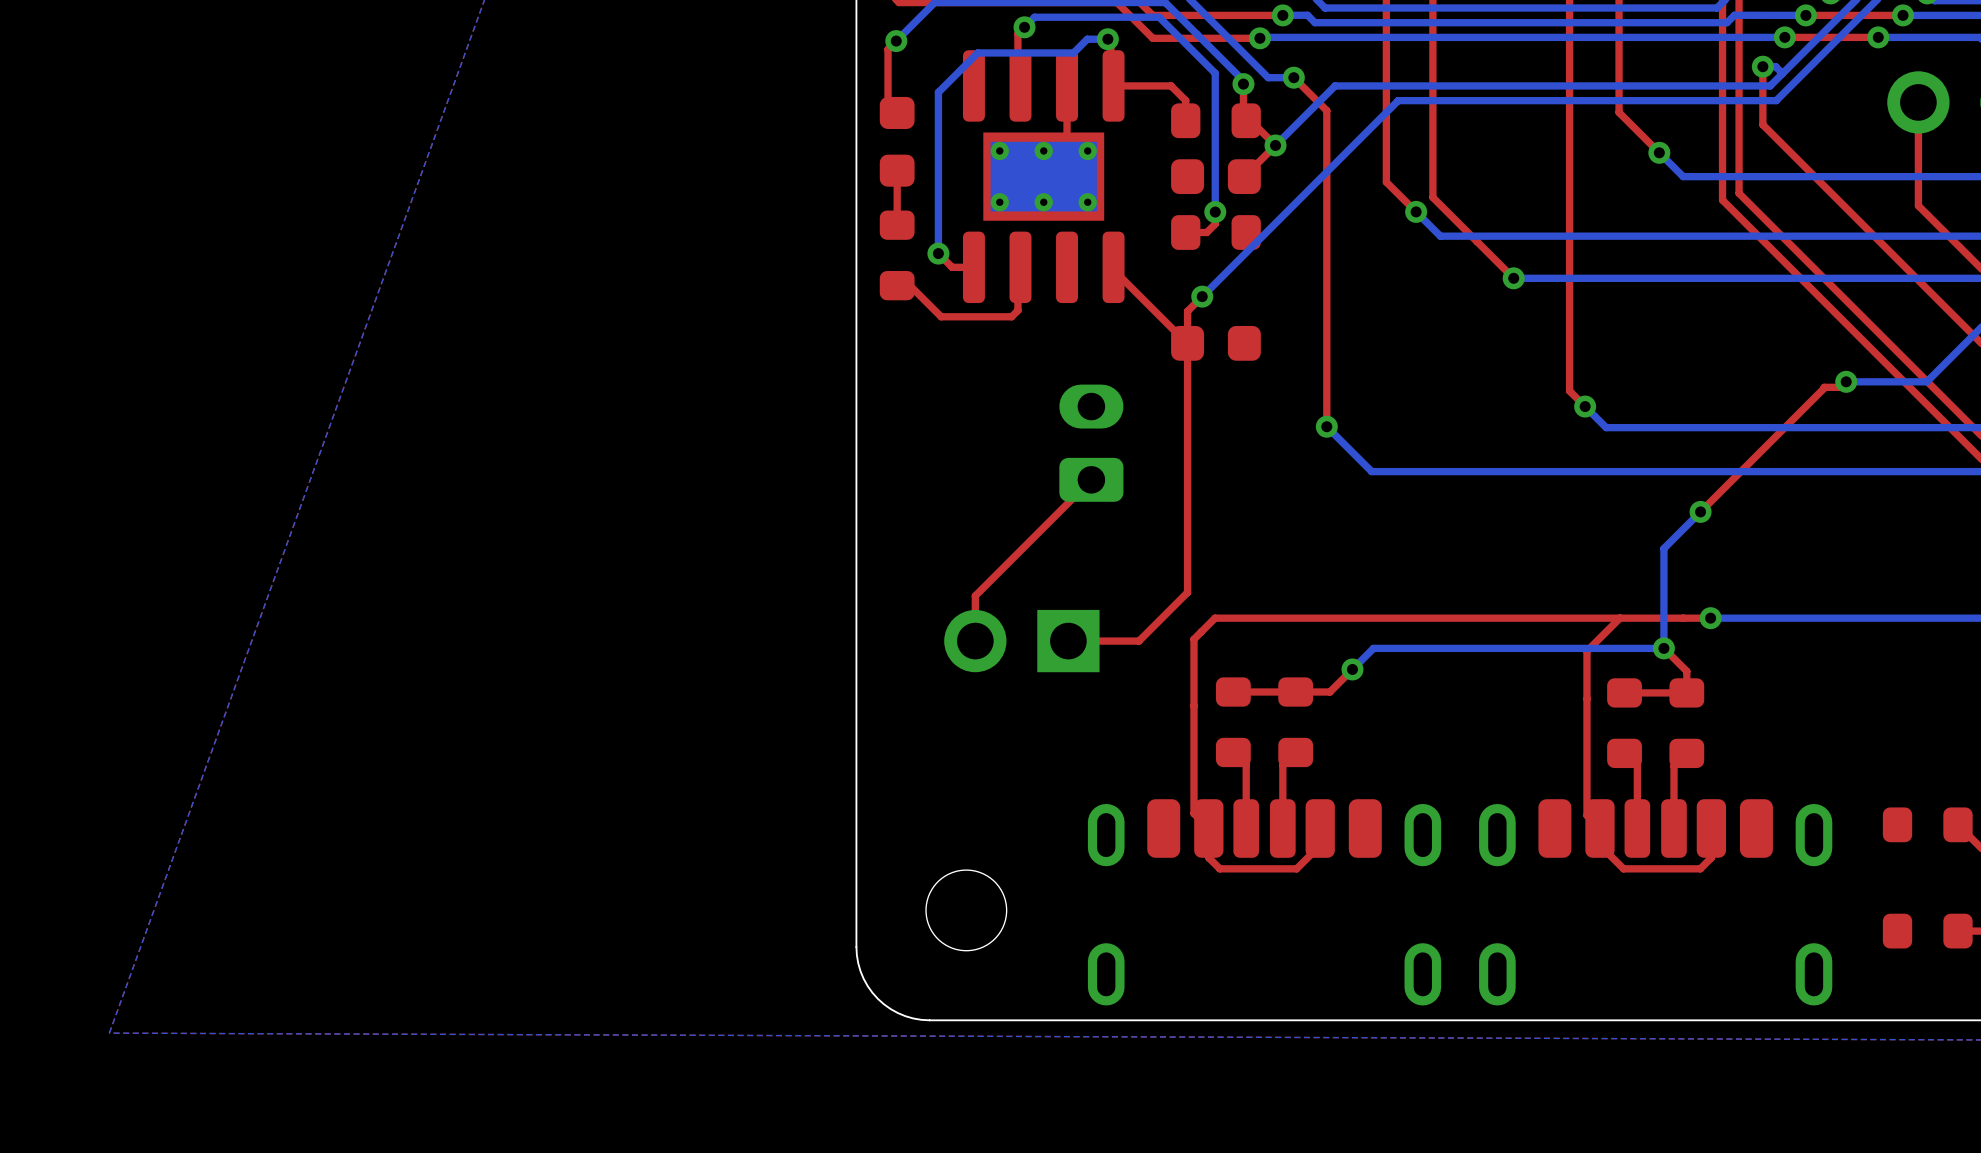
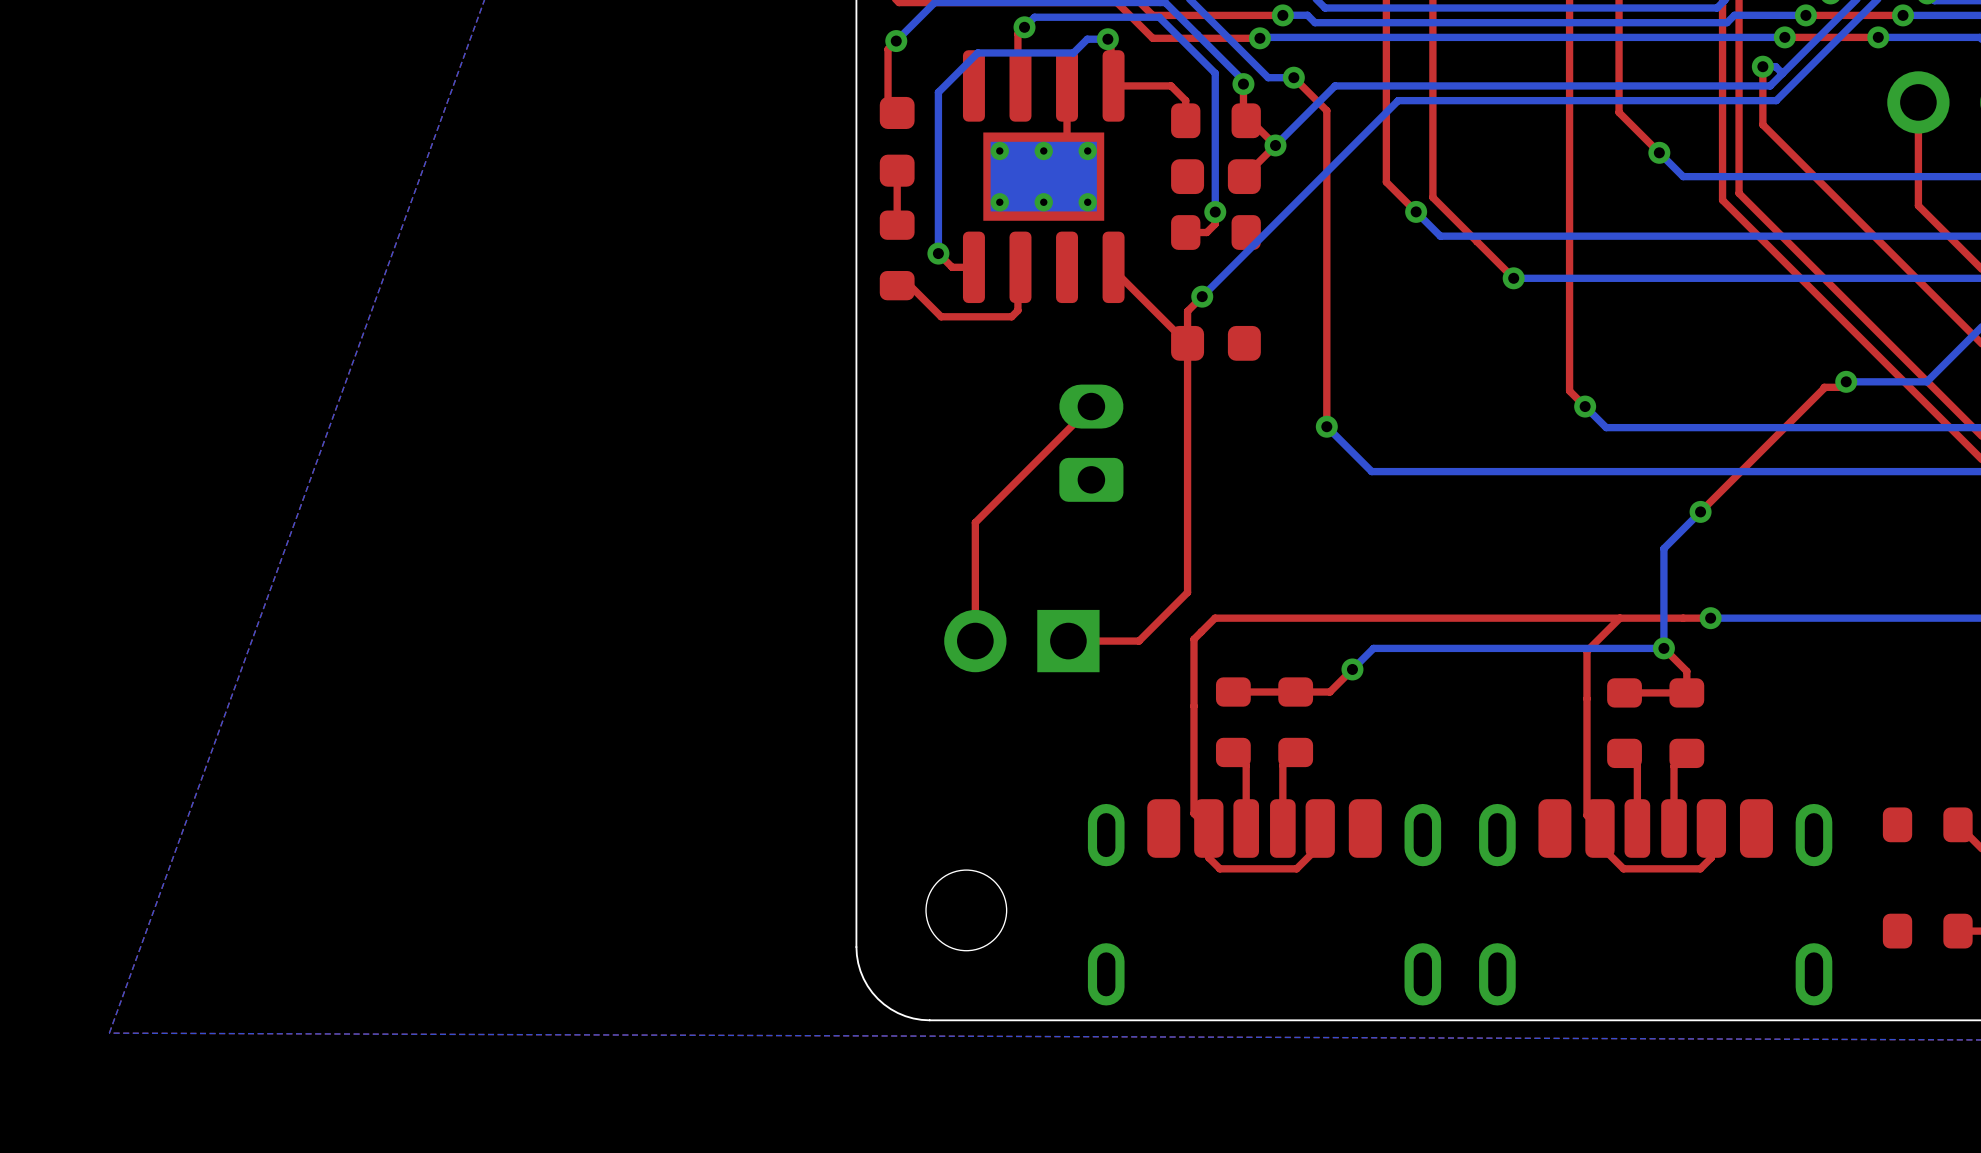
top track: (1091, 479) (975, 595) -> (1091, 406) (975, 522) (975, 595)

